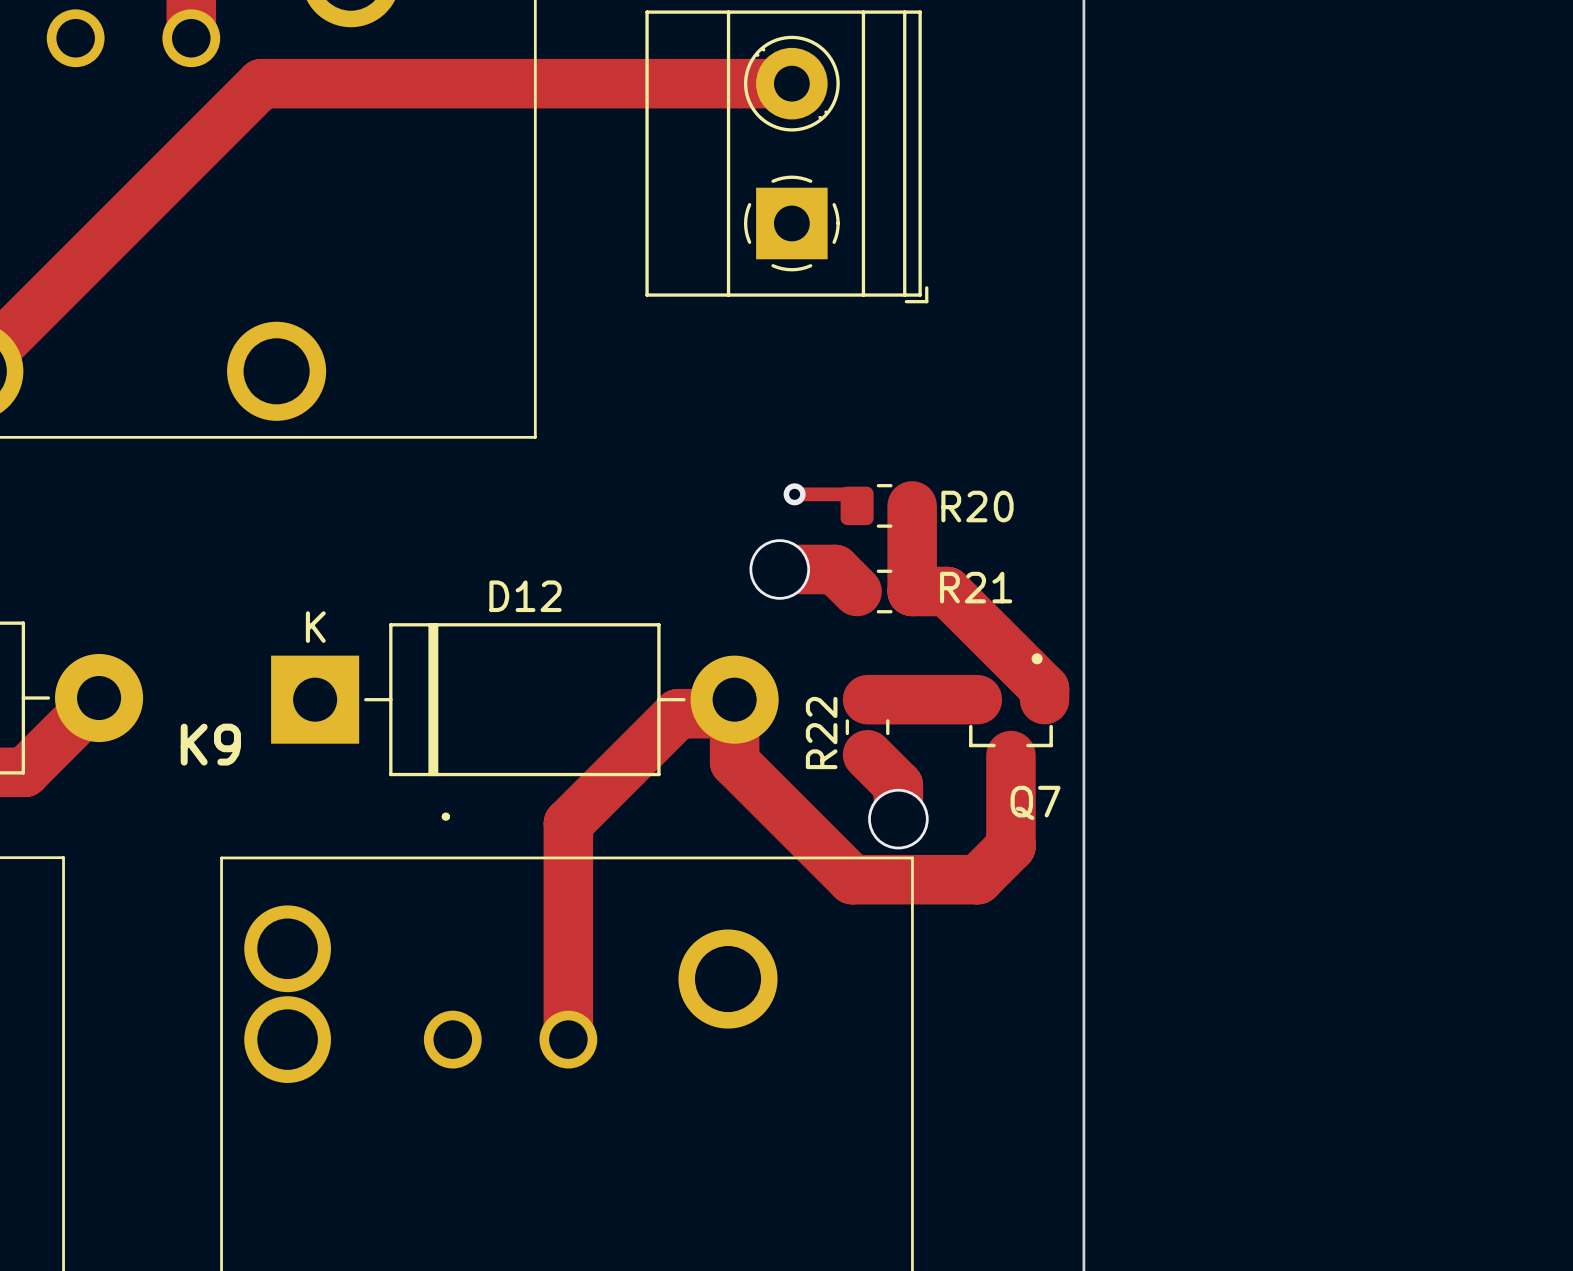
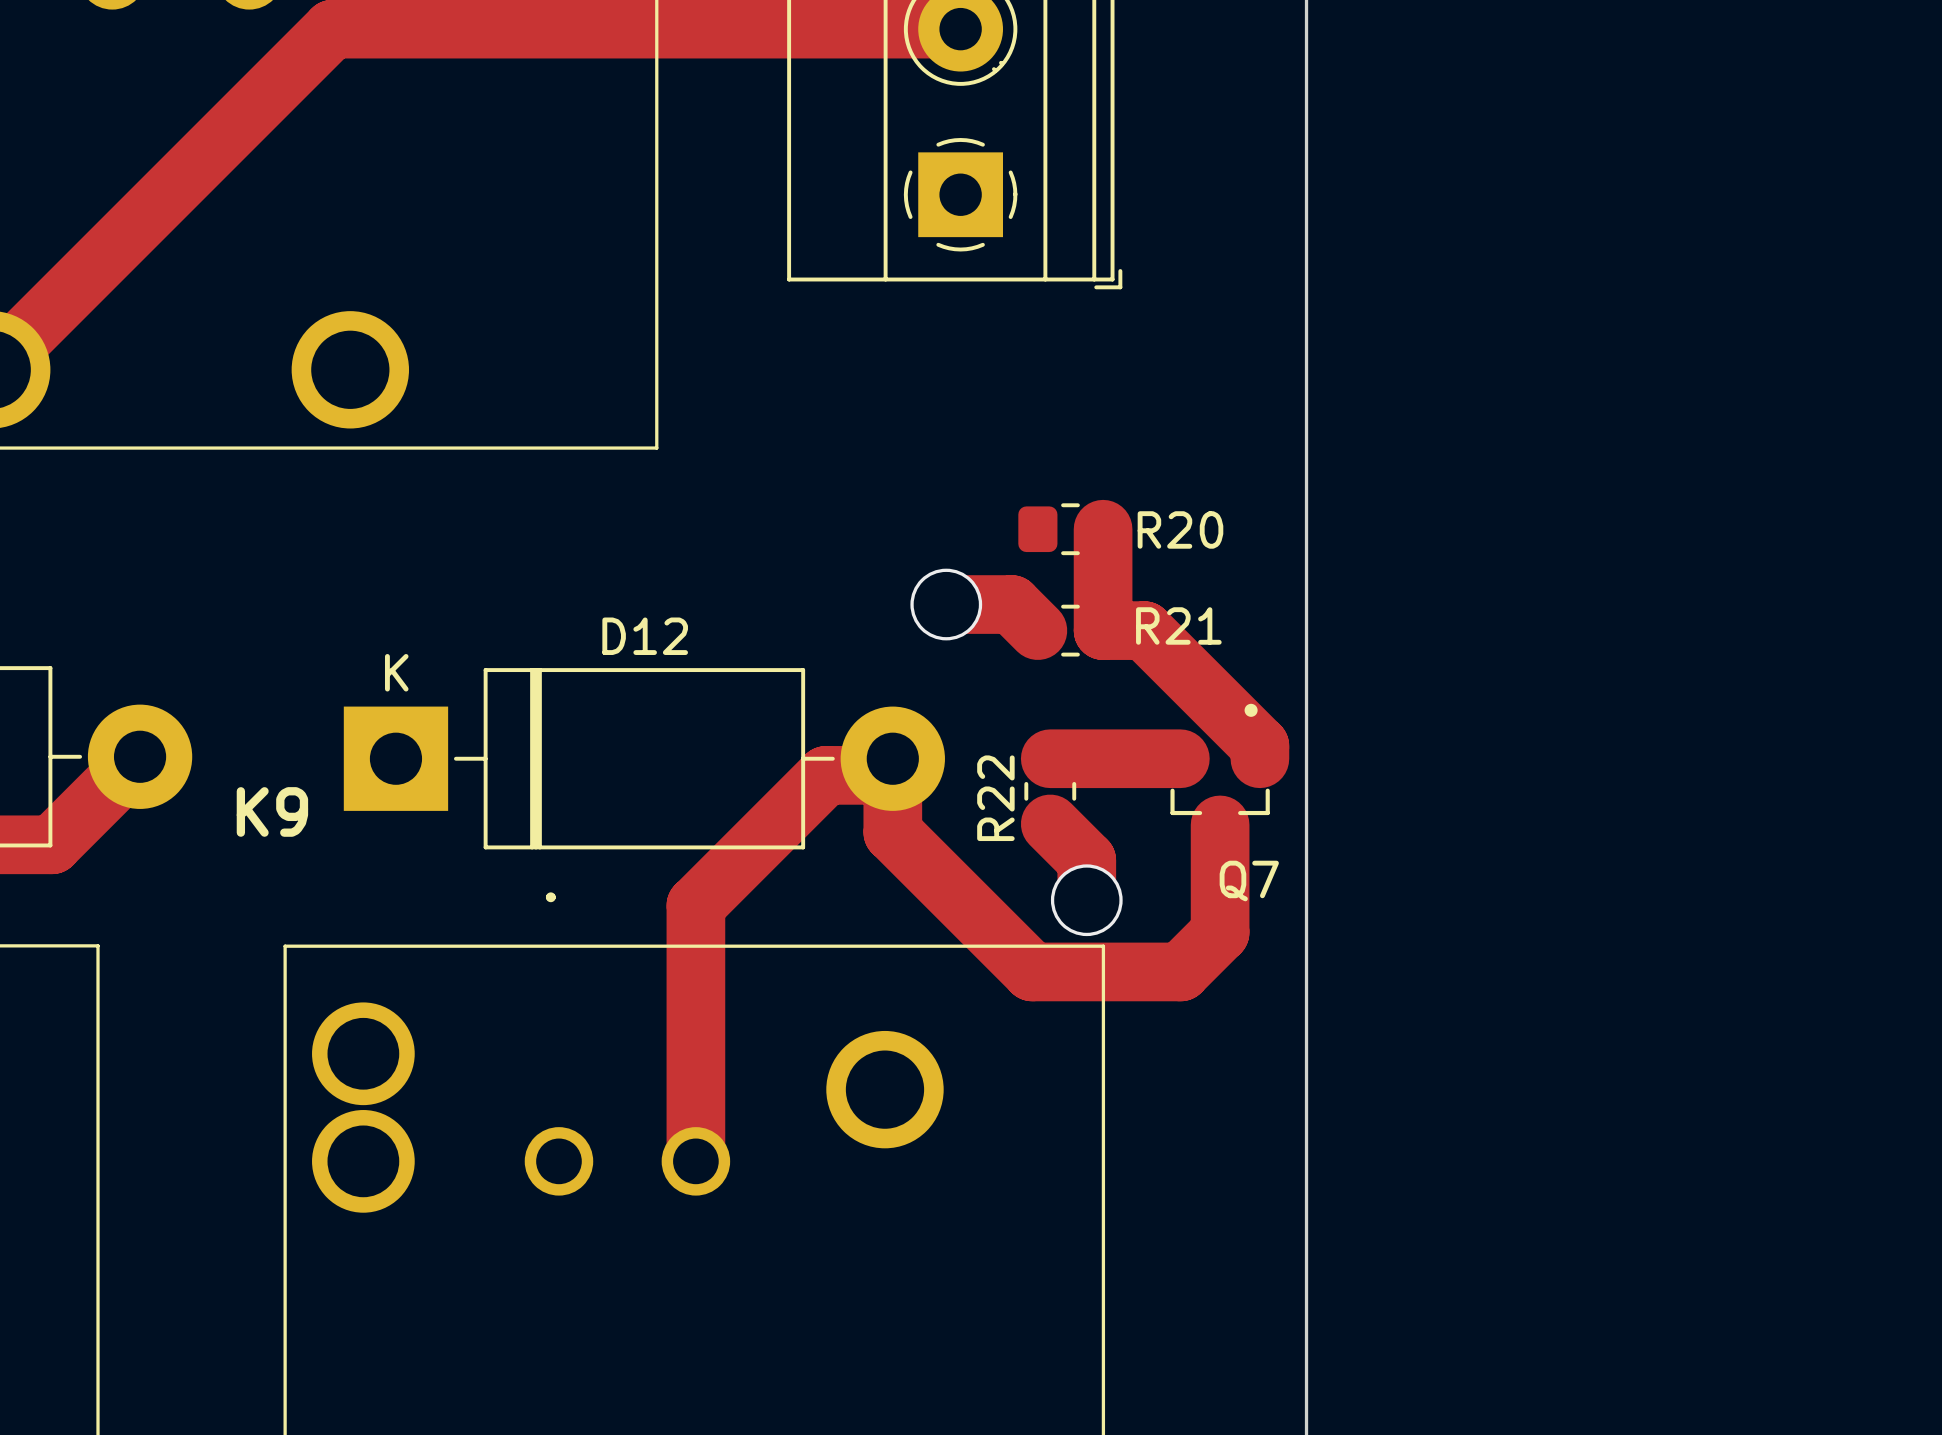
track: (794, 494) (845, 494) (857, 505) -> none
via: (794, 494) -> none

